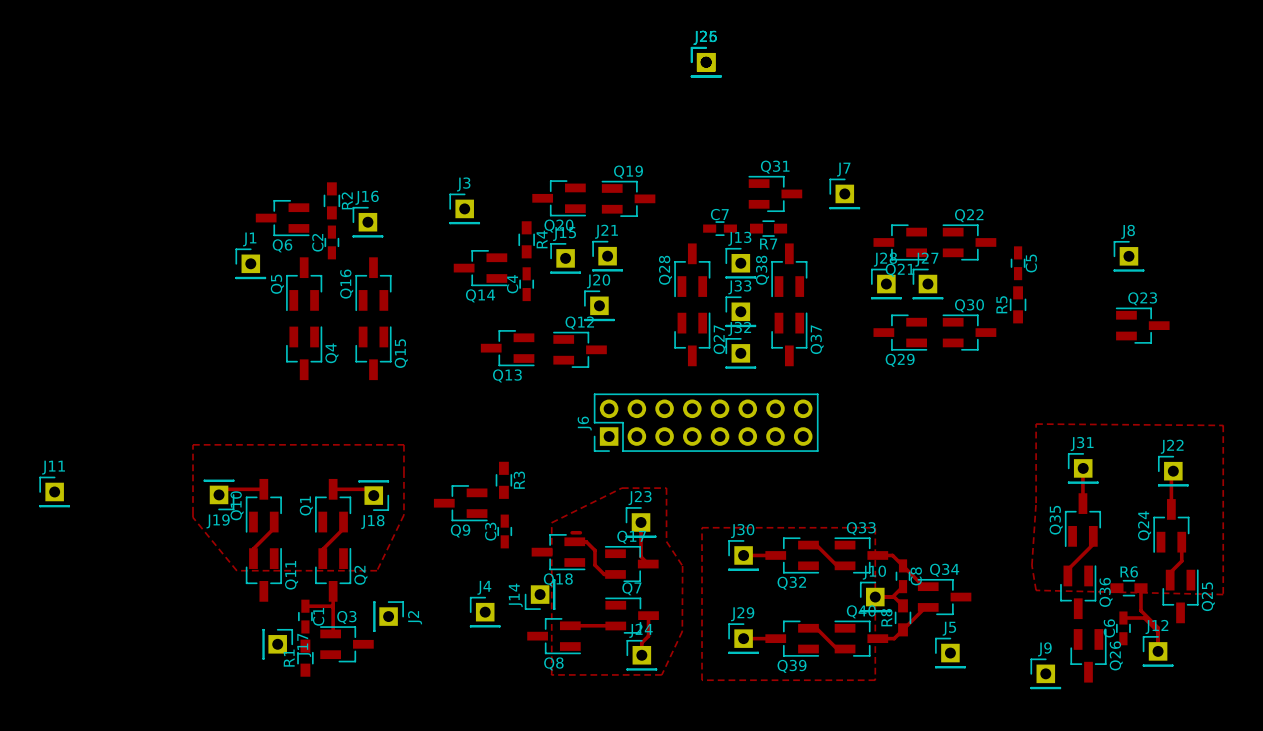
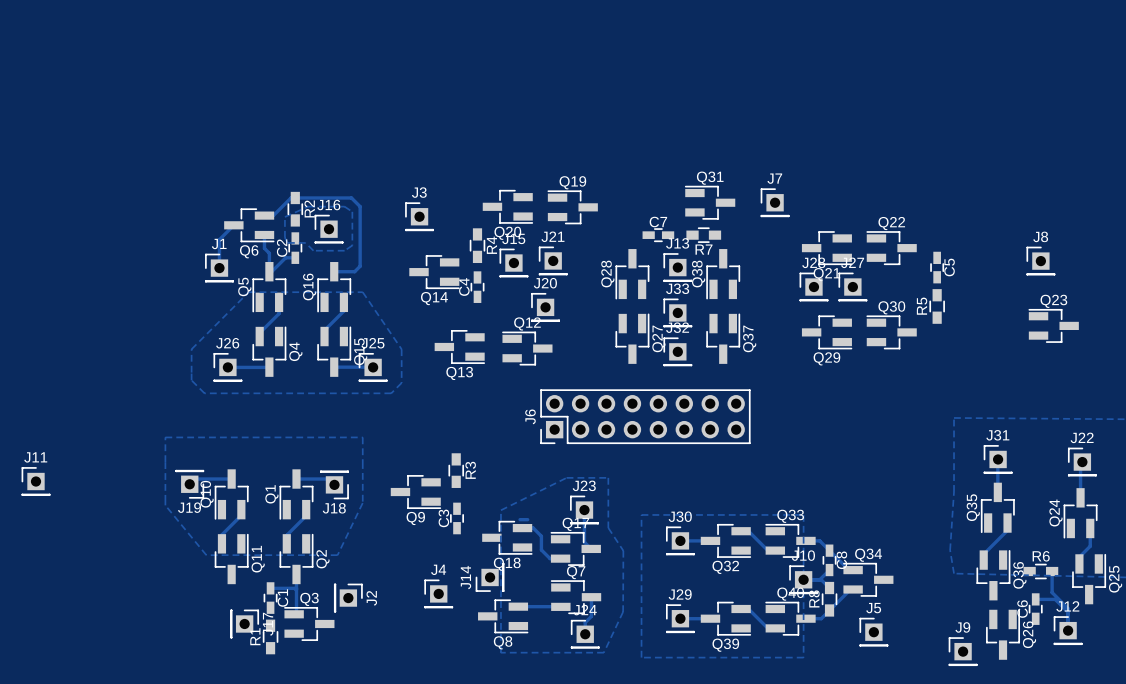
J25 position: (706, 62) -> (373, 367)
J26 position: (706, 62) -> (227, 367)
zone outline: none -> (308, 206) (284, 217) (284, 237) (287, 242) (305, 242) (313, 250) (344, 250) (352, 245) (352, 211) (344, 206) (308, 206)
track: none -> (264, 215) (273, 215) (290, 197) (351, 197) (360, 206) (360, 266) (354, 271) (334, 271)
track: none -> (233, 225) (219, 239) (219, 268)
track: none -> (264, 235) (264, 248) (269, 253) (269, 271) (271, 271) (285, 257) (295, 257)
zone outline: none -> (248, 292) (191, 349) (191, 380) (204, 393) (391, 393) (401, 382) (401, 349) (362, 292) (248, 292)
track: none -> (279, 302) (279, 313) (259, 333) (259, 336)
track: none -> (343, 302) (343, 311) (324, 330) (324, 336)
track: none -> (269, 367) (227, 367)
track: none -> (334, 367) (373, 367)

